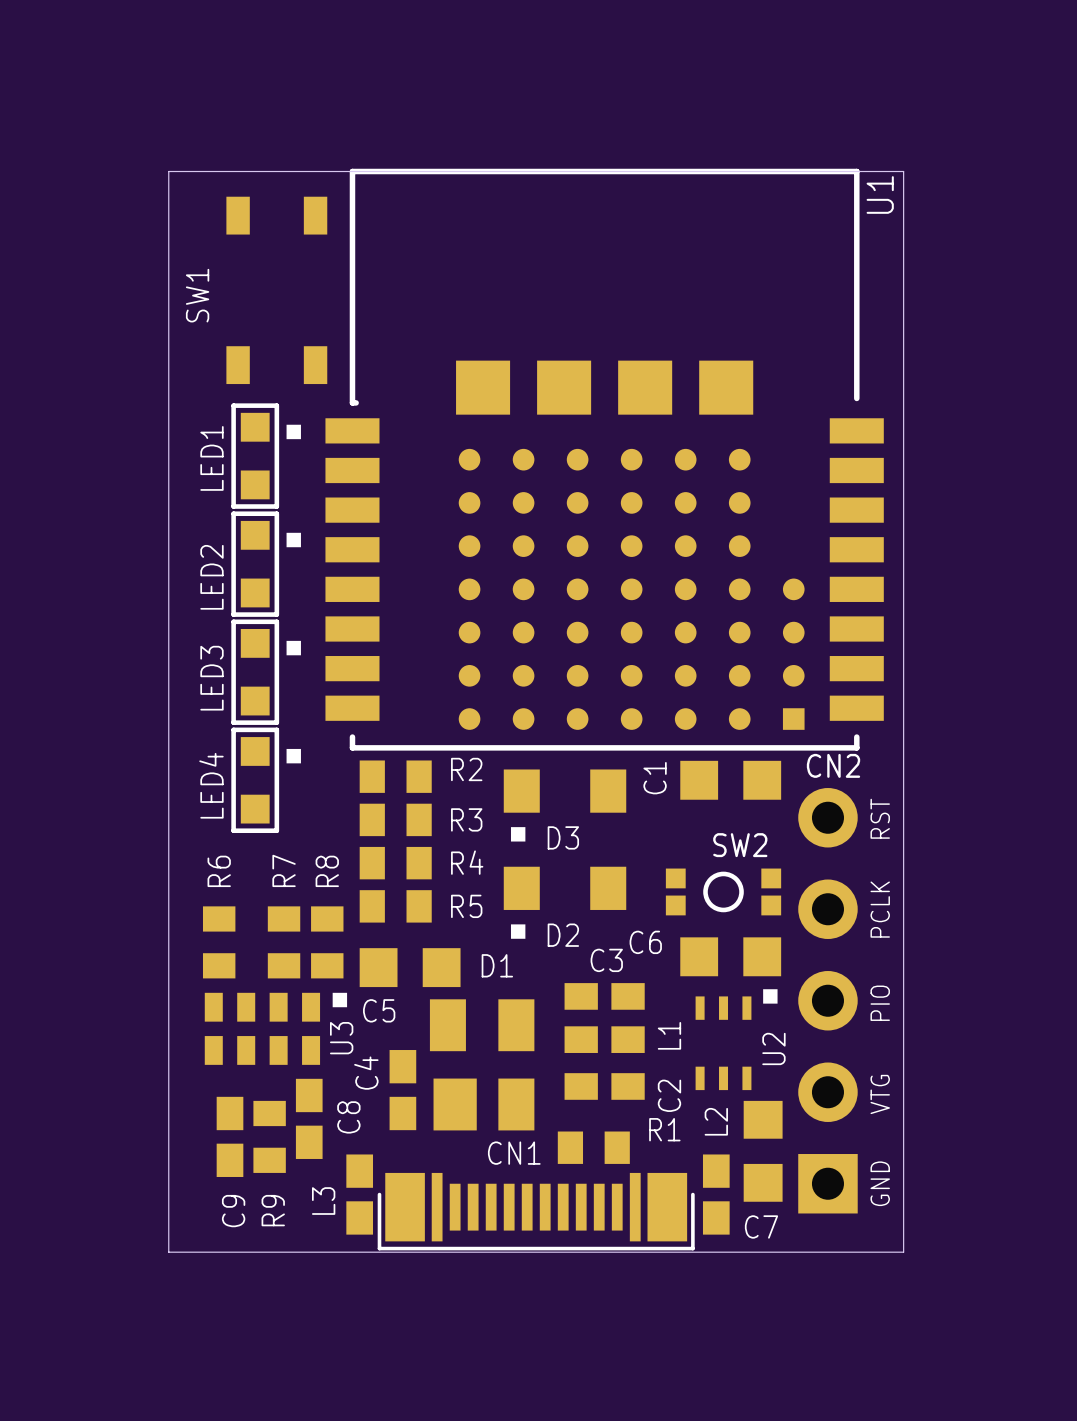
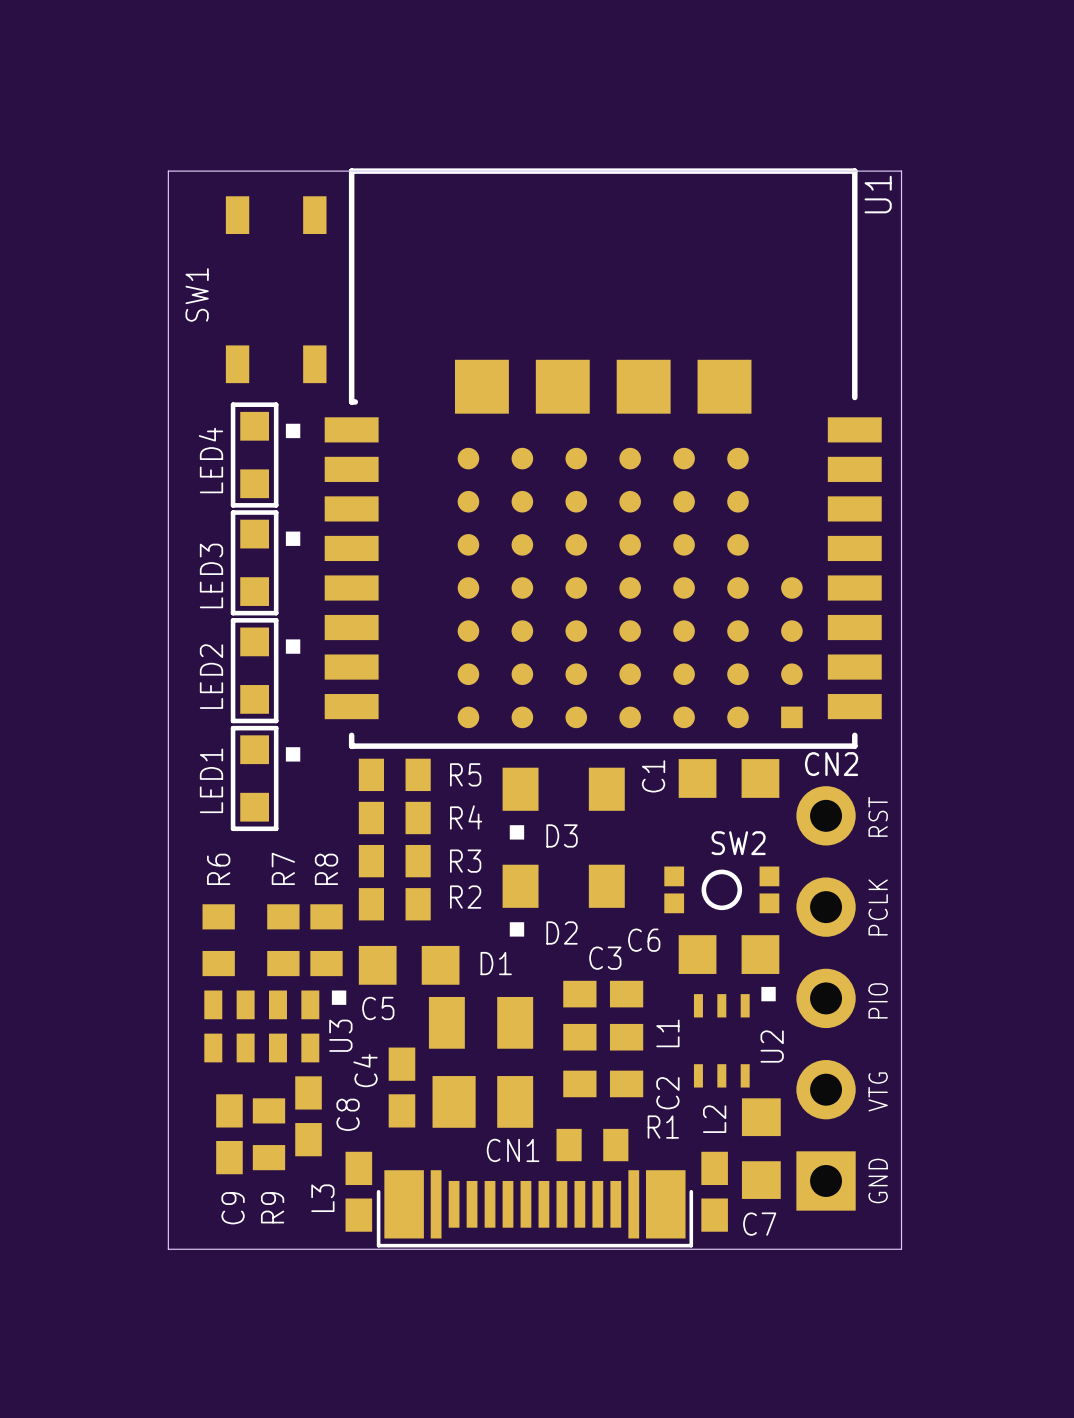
LED1 name: LED1 (211, 458) -> LED4 (210, 460)
LED2 name: LED2 (211, 577) -> LED3 (211, 575)
LED3 name: LED3 (211, 678) -> LED2 (211, 676)
R2 name: R2 (466, 769) -> R5 (465, 774)
LED4 name: LED4 (211, 785) -> LED1 (211, 780)
R3 name: R3 (466, 819) -> R4 (466, 817)
R4 name: R4 (467, 862) -> R3 (465, 861)
R5 name: R5 (466, 906) -> R2 (465, 897)

